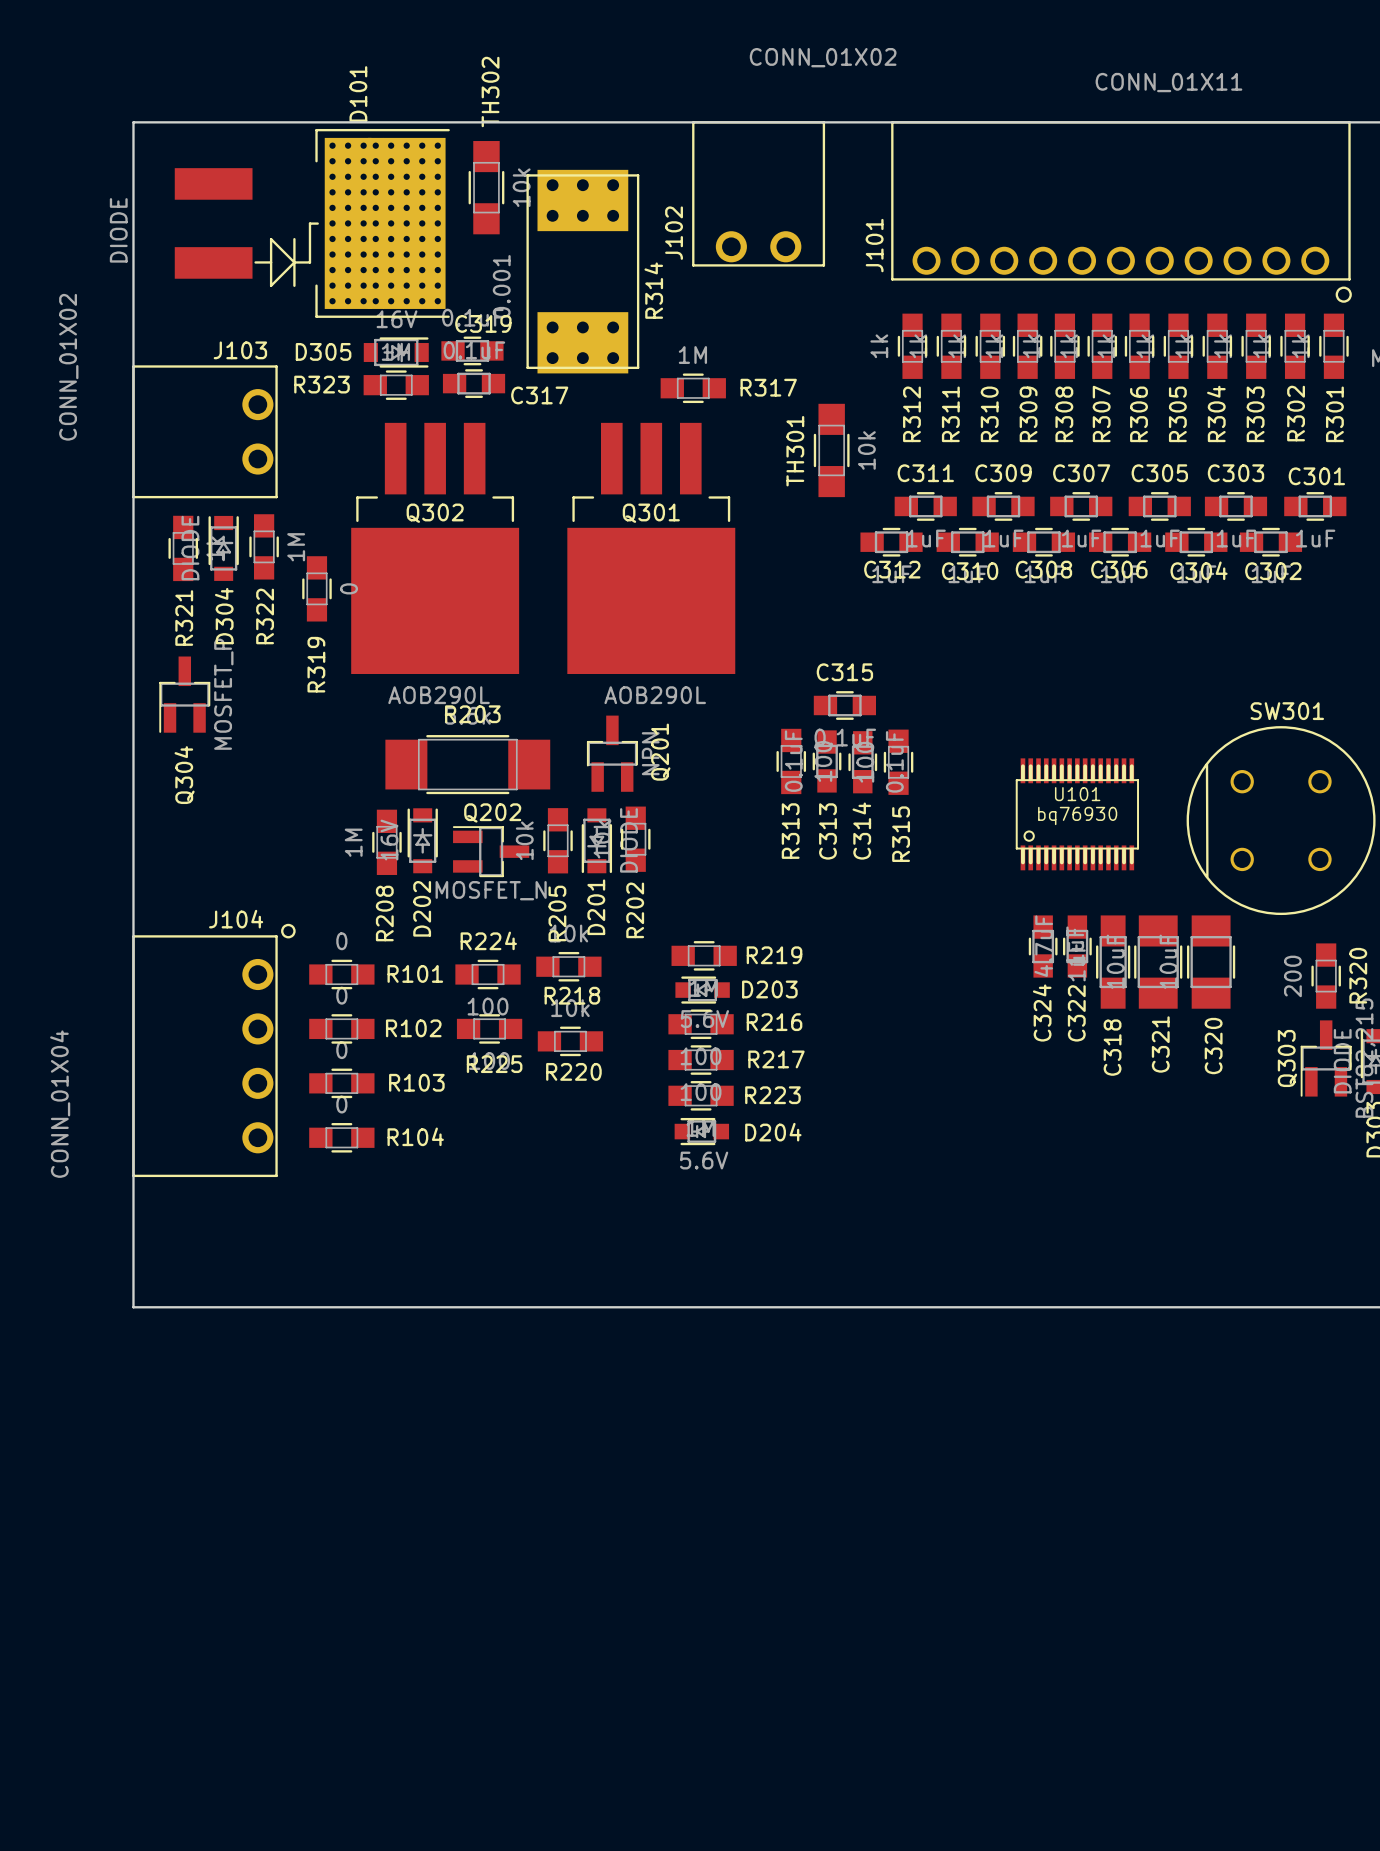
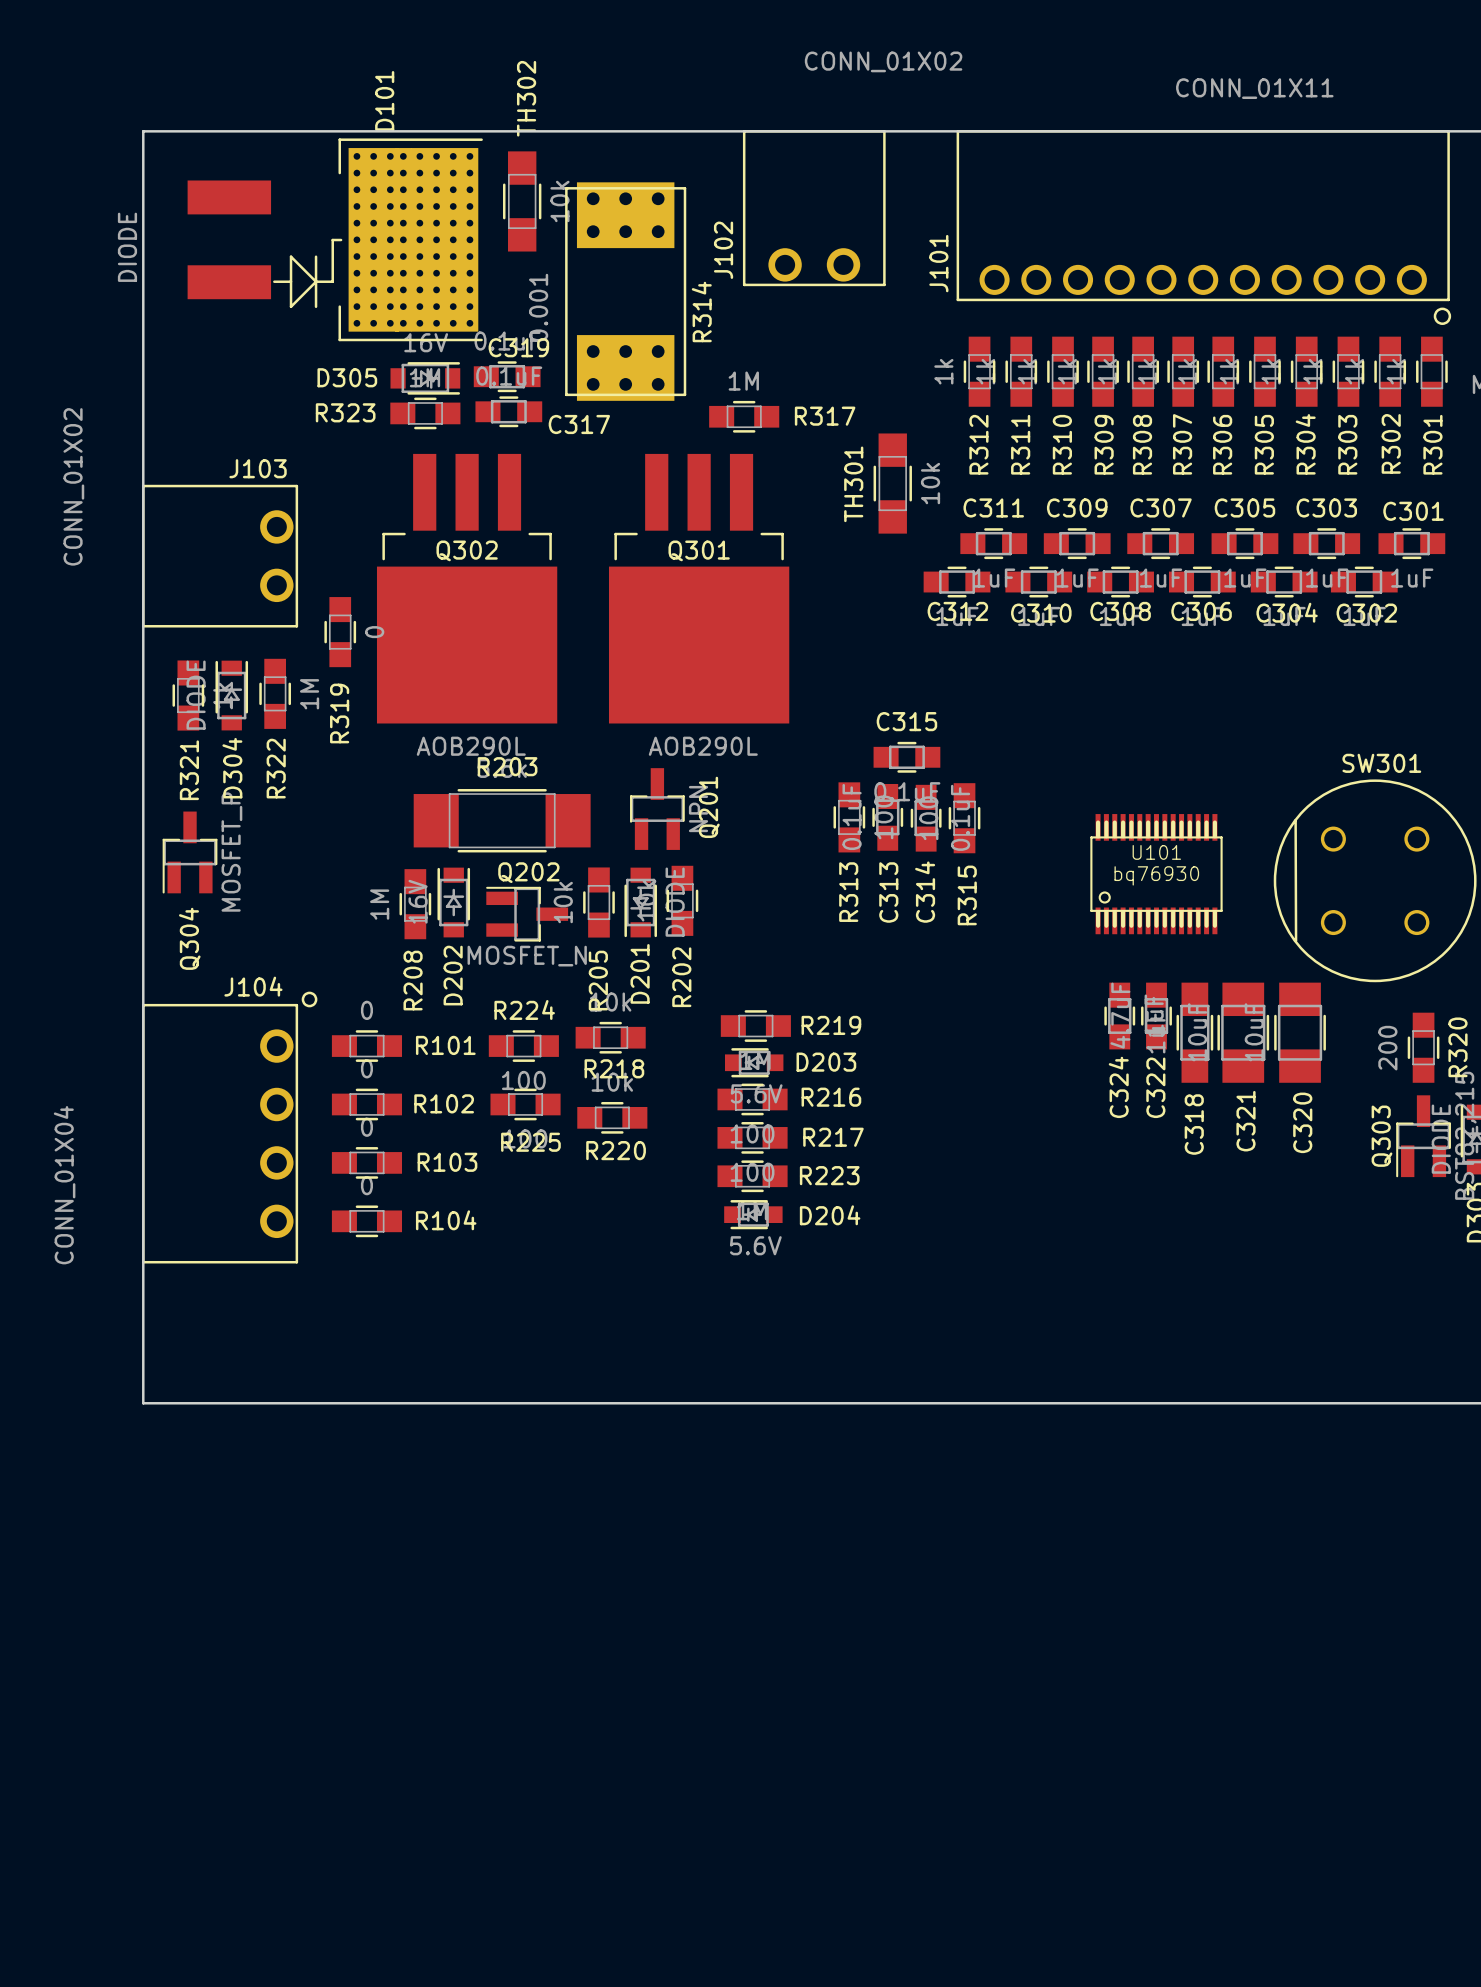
J103 position: (205, 431) -> (220, 556)
R322 position: (264, 546) -> (275, 693)
R321 position: (183, 548) -> (188, 695)
D304 position: (223, 548) -> (231, 695)
Q304 position: (184, 694) -> (190, 852)

